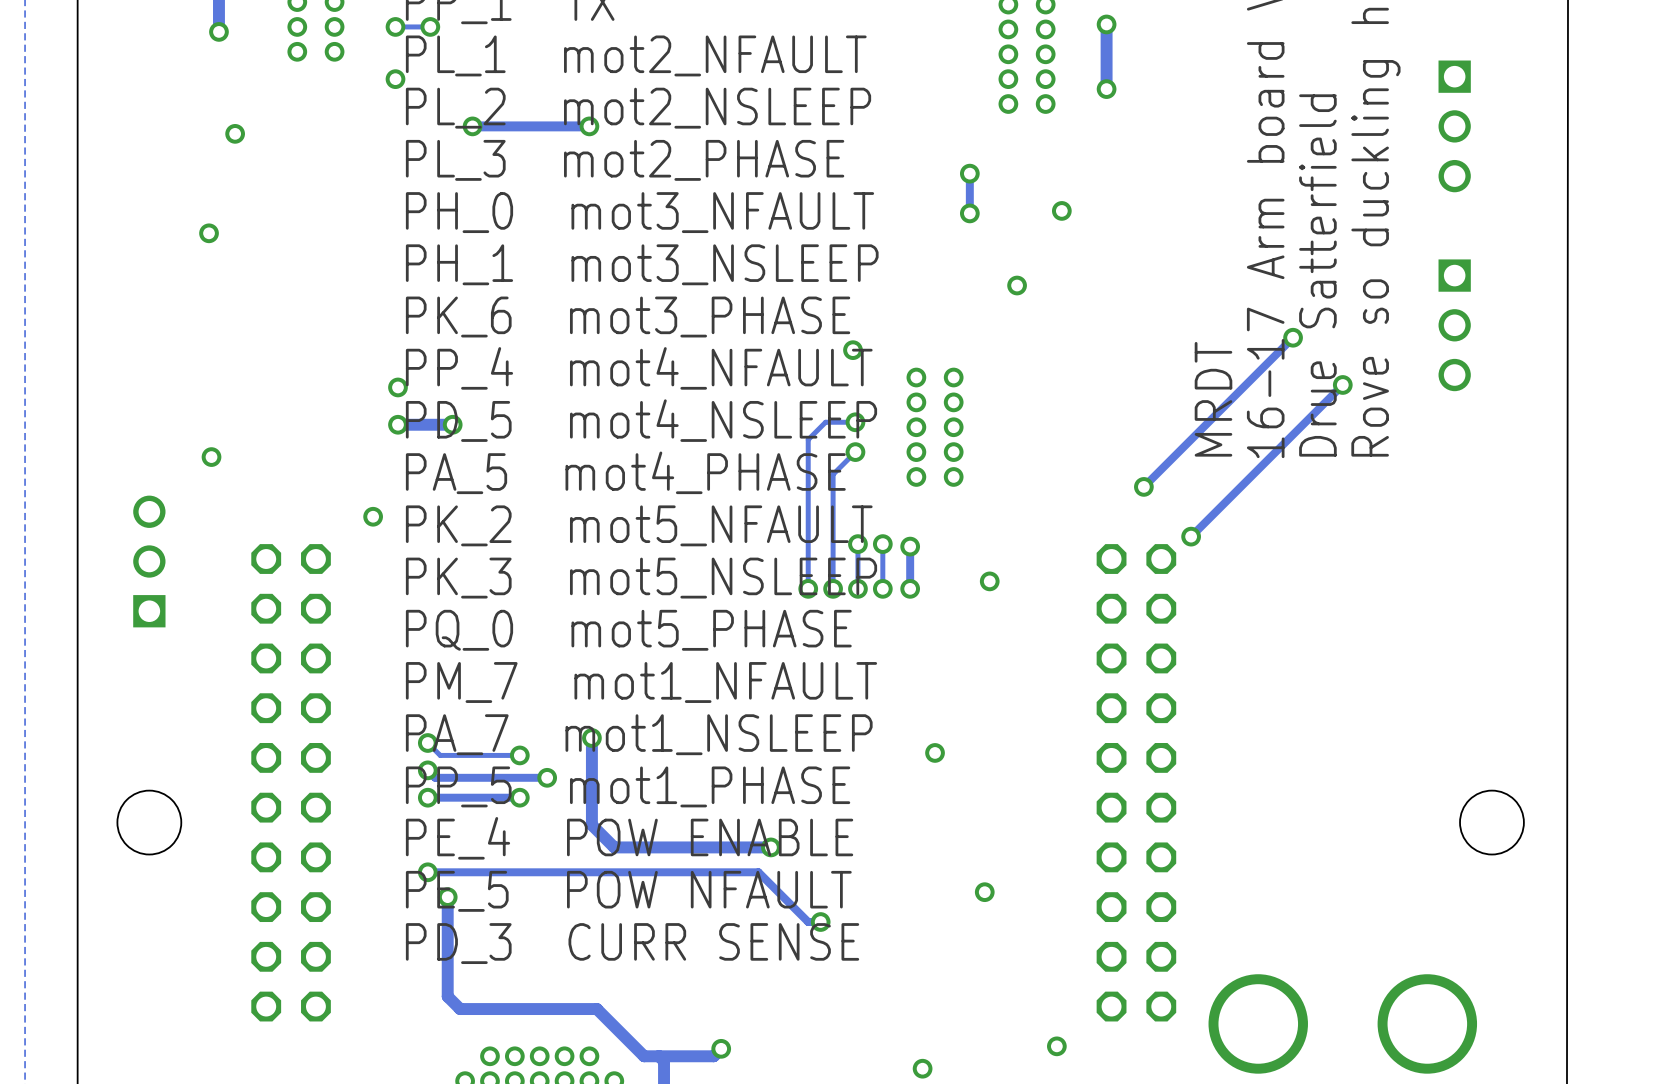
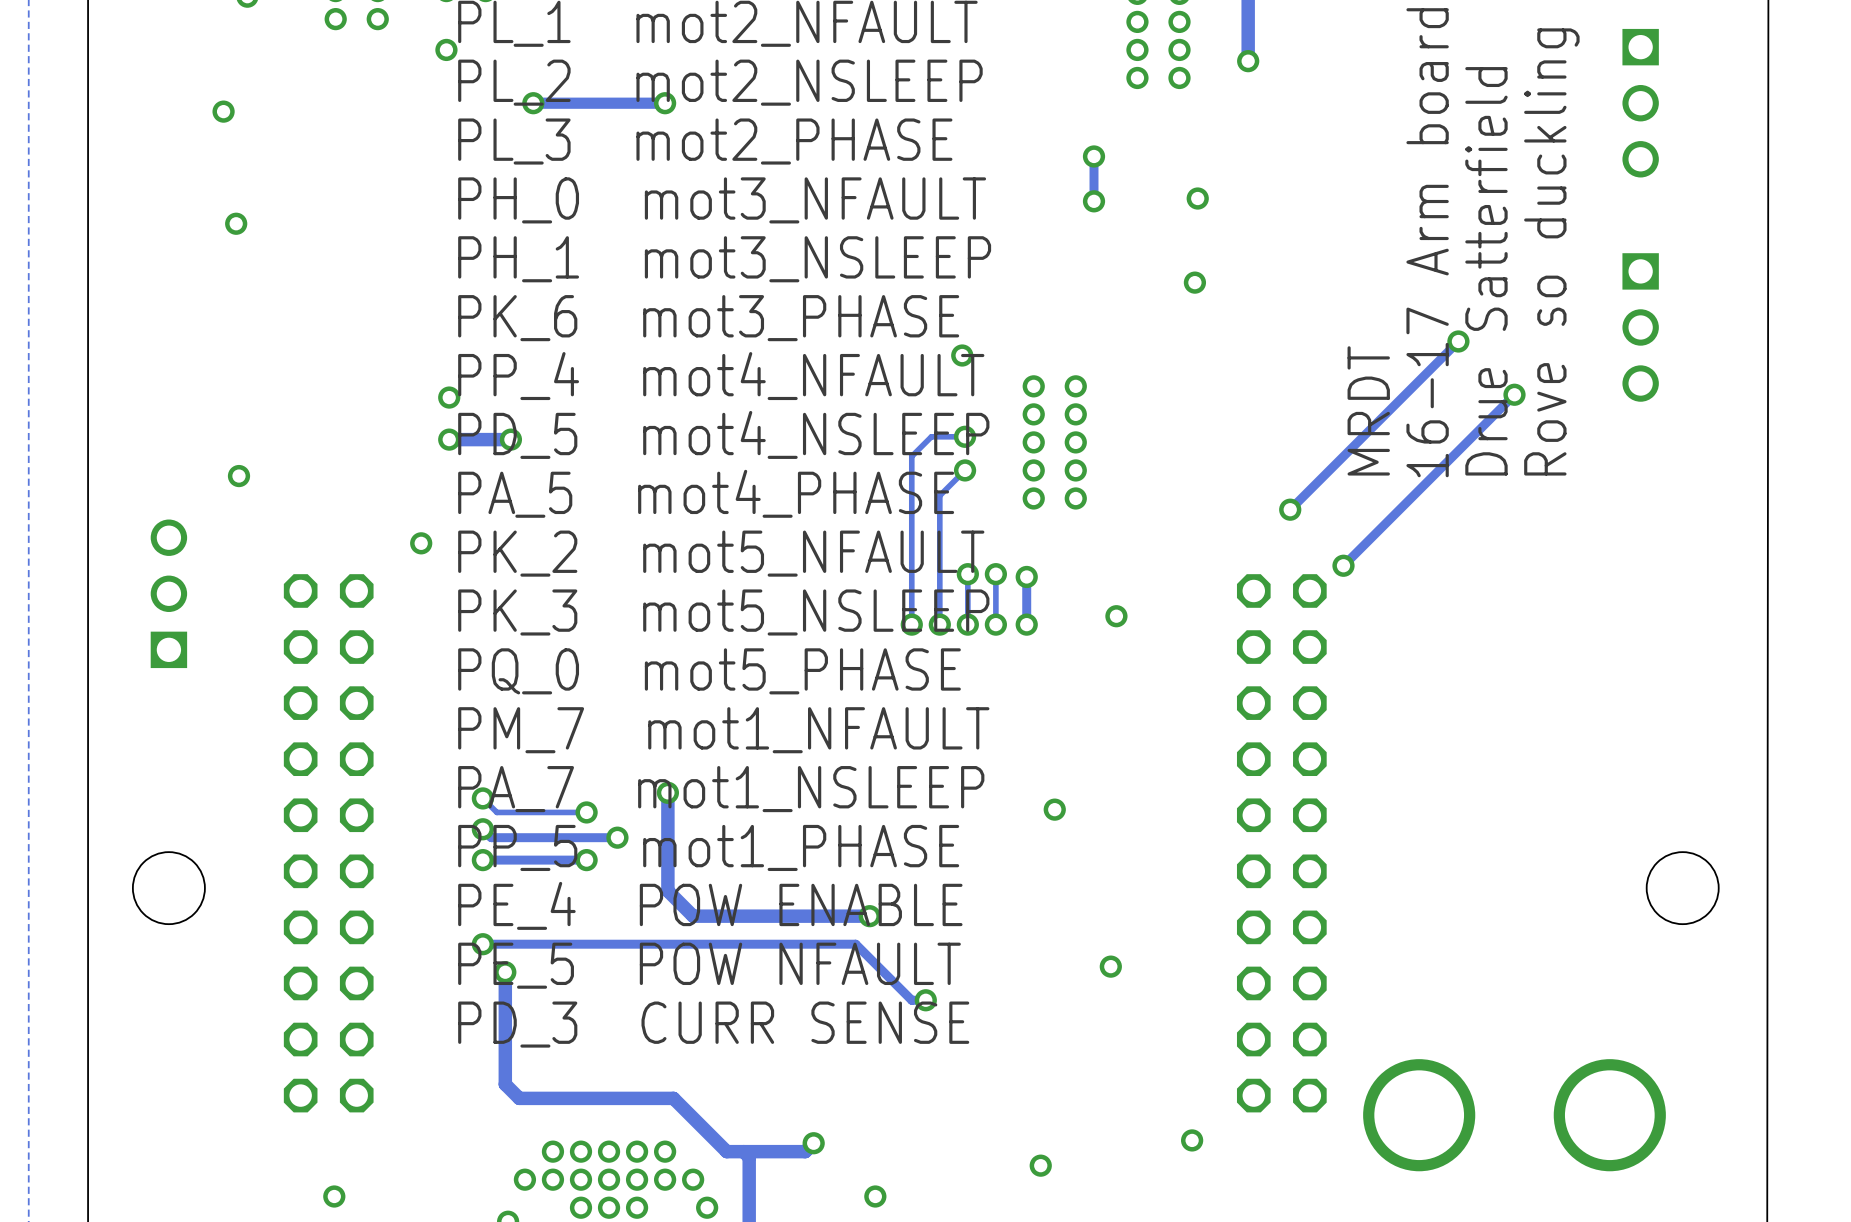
via position: (235, 133) -> (223, 111)
via position: (1017, 285) -> (1194, 282)

